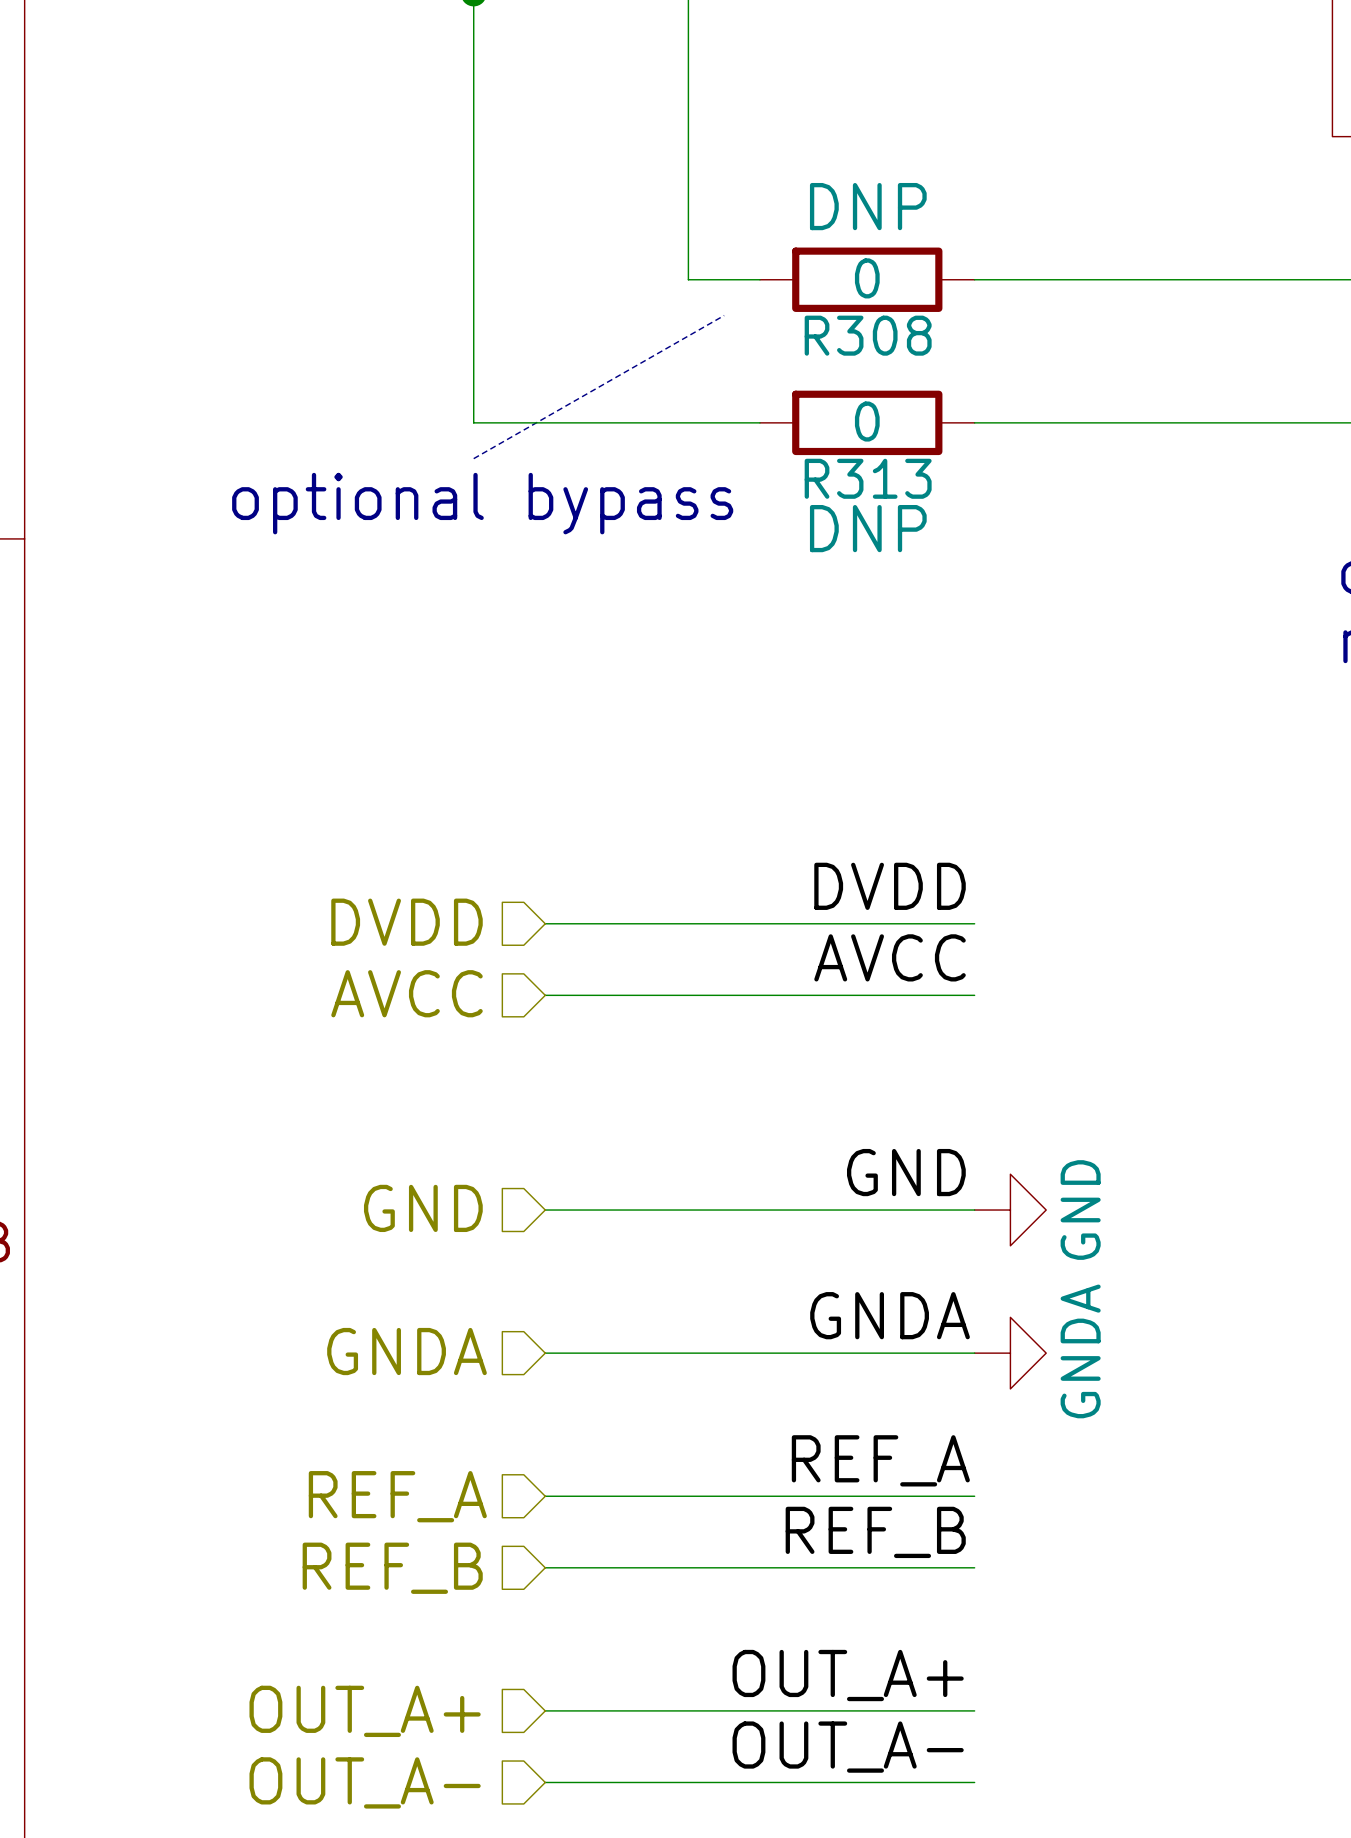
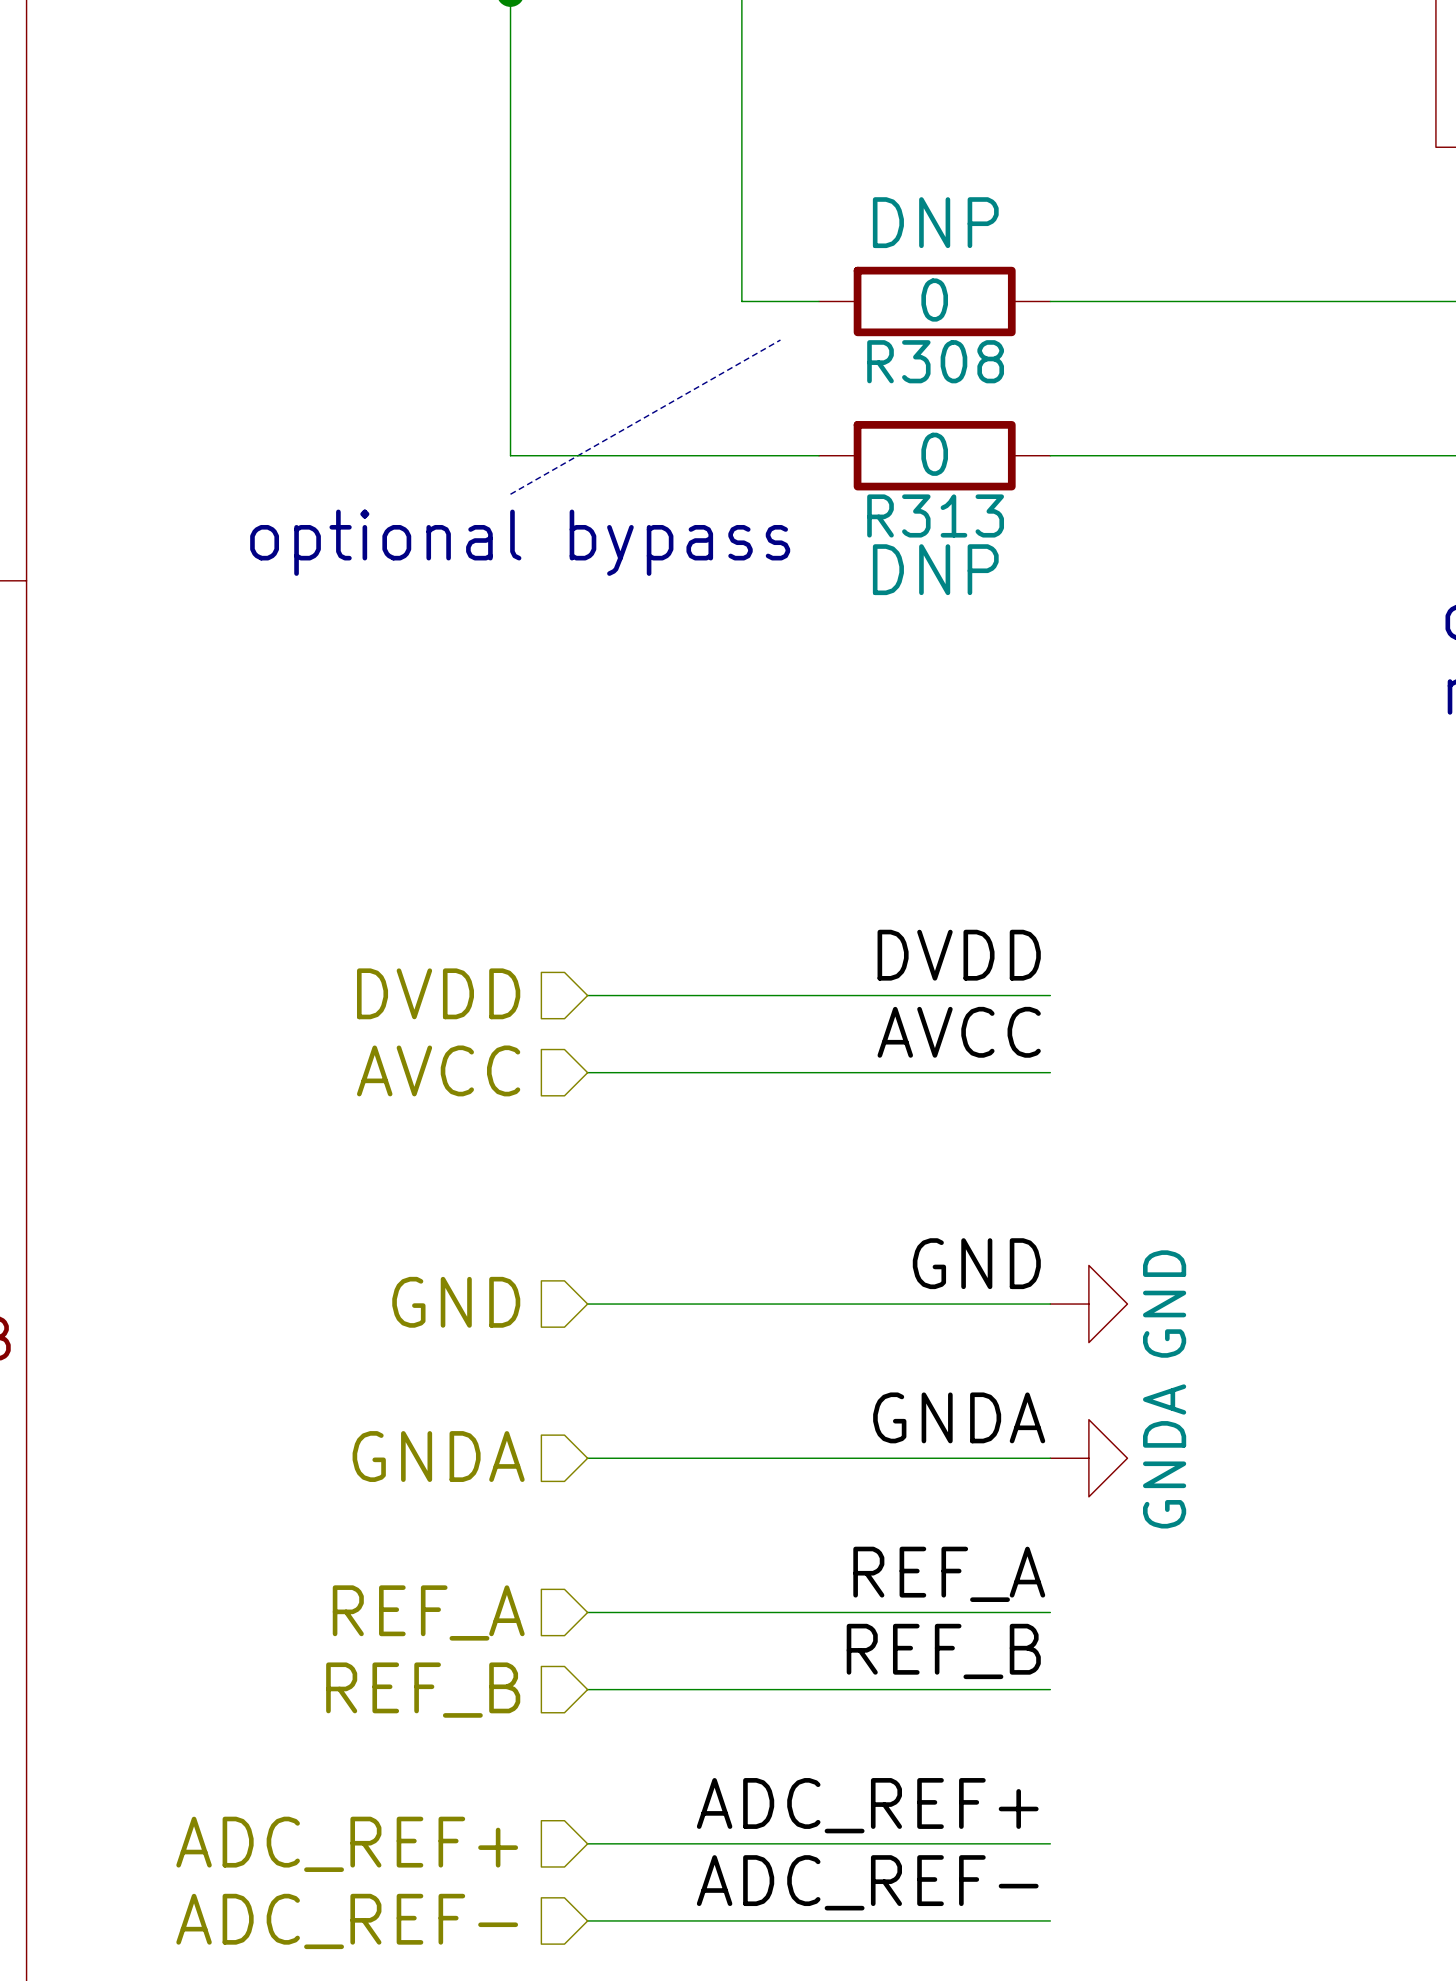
label: OUT_A+ (848, 1675) -> ADC_REF+ (867, 1805)
hierarchical label: OUT_A+ (365, 1711) -> ADC_REF+ (347, 1844)
label: OUT_A- (848, 1747) -> ADC_REF- (867, 1882)
hierarchical label: OUT_A- (365, 1782) -> ADC_REF- (347, 1921)

